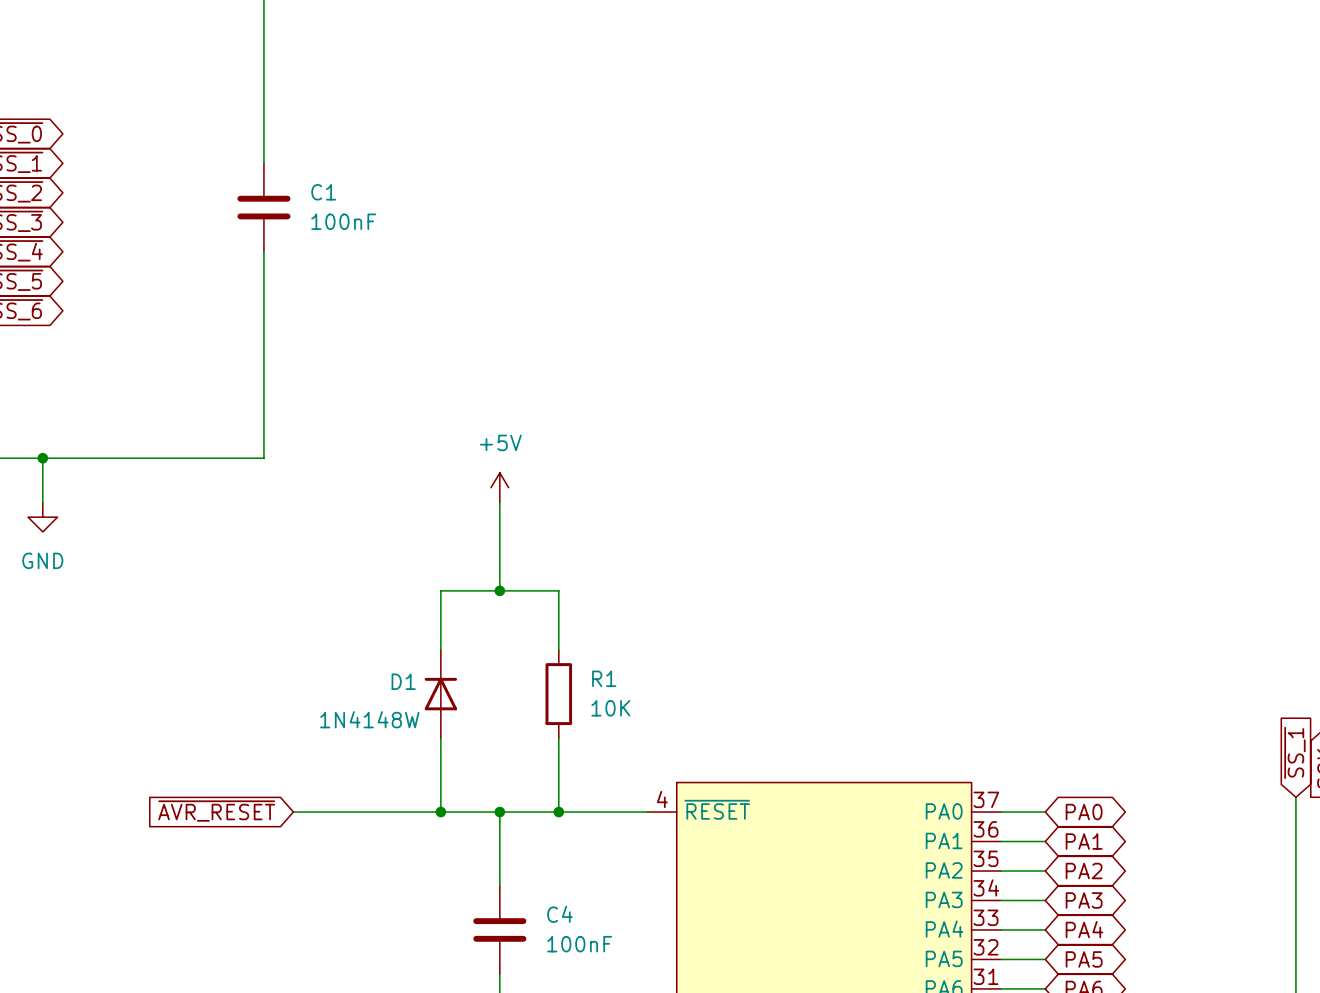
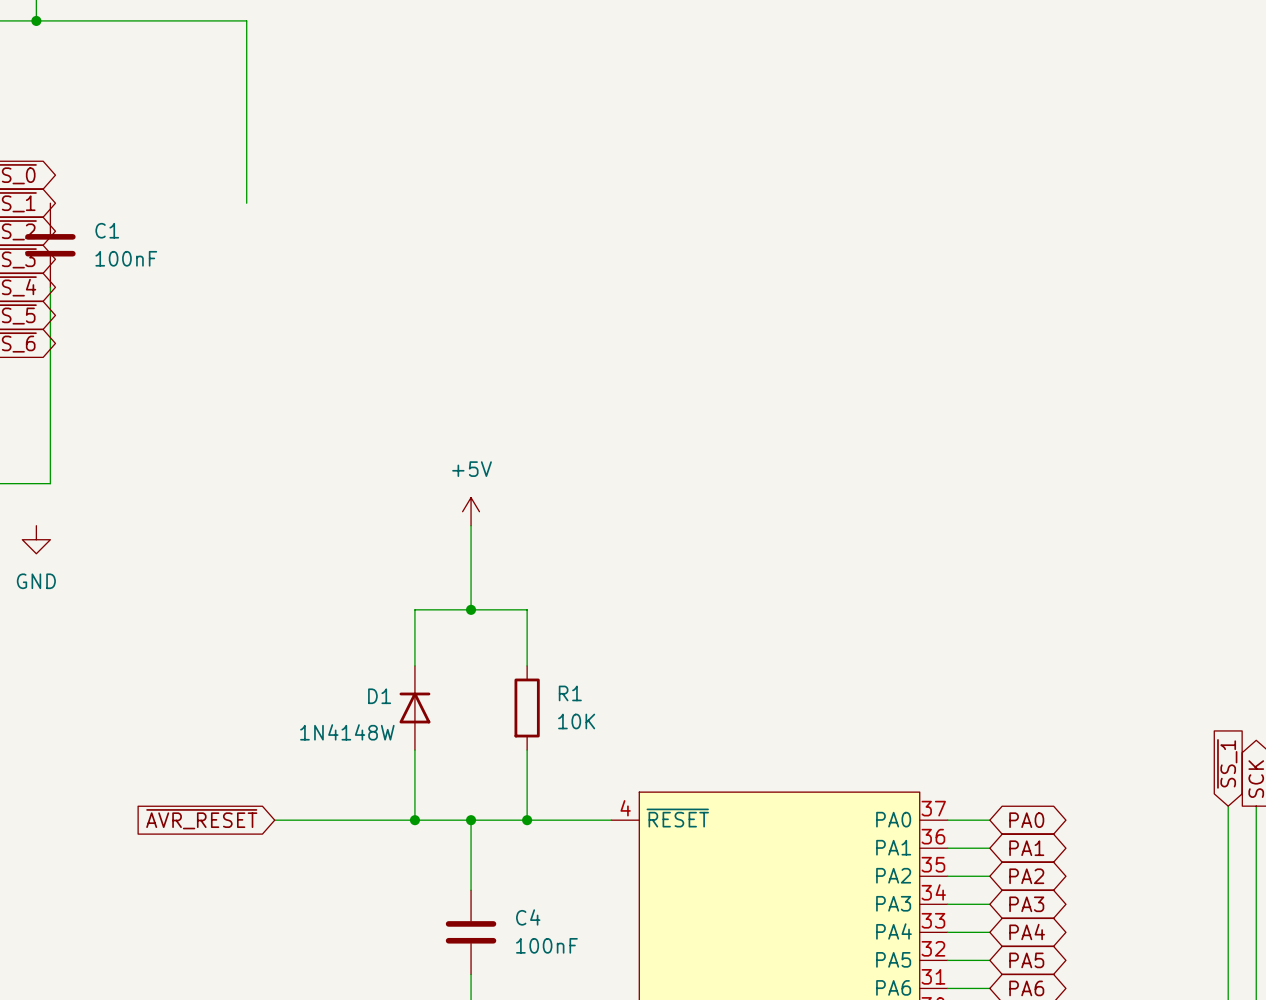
C1 position: (263, 207) -> (50, 245)
wire: (263, 251) (263, 458) (57, 458) -> (50, 287) (50, 483)
wire: (42, 458) (42, 502) -> none
junction: (42, 458) -> none

